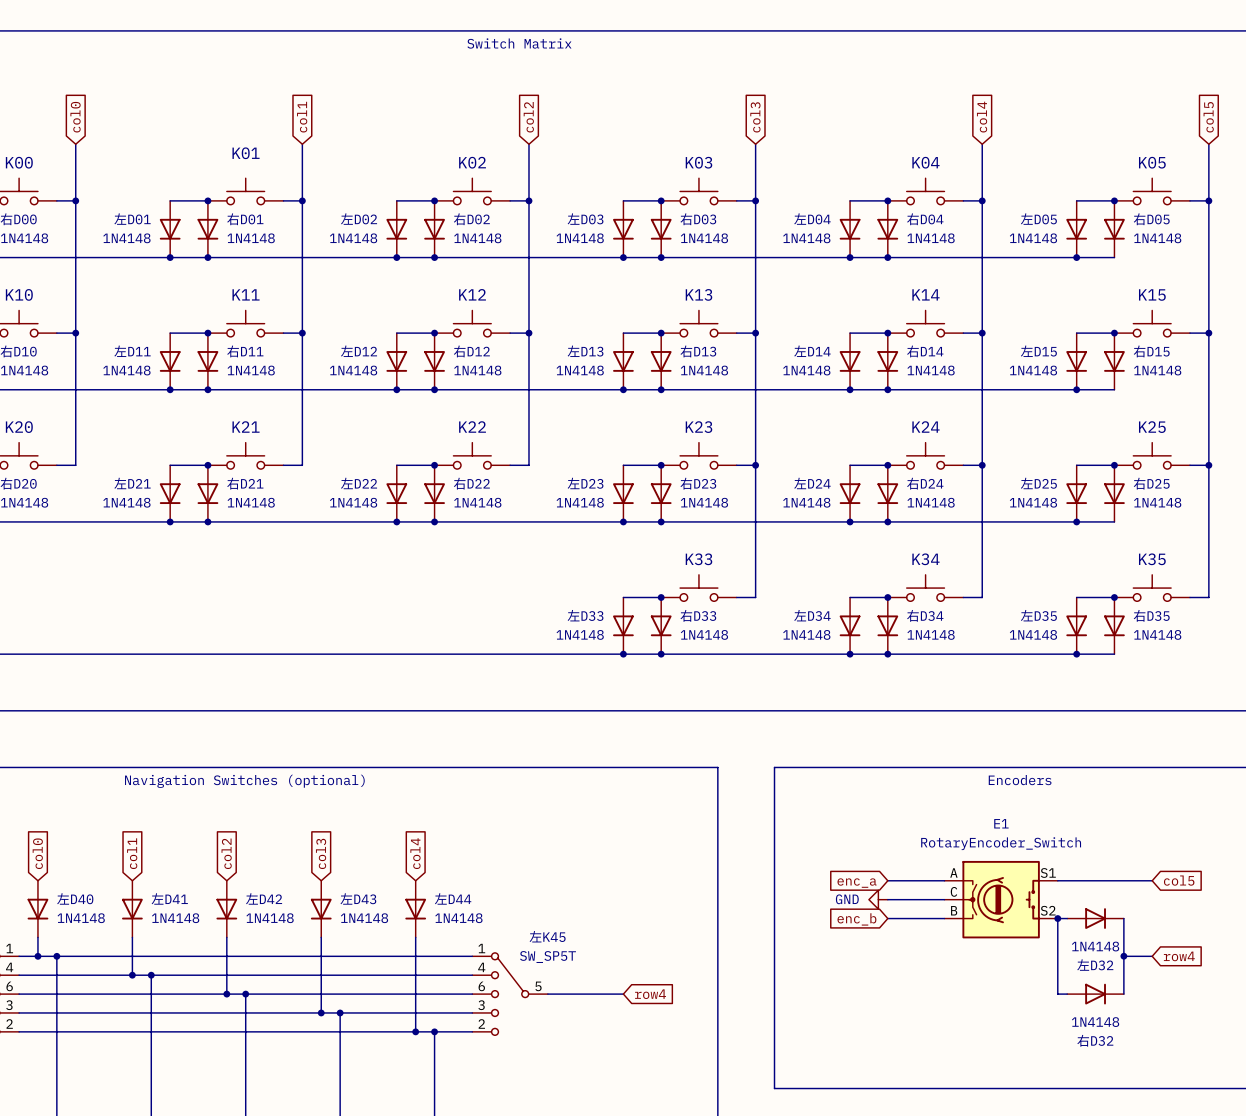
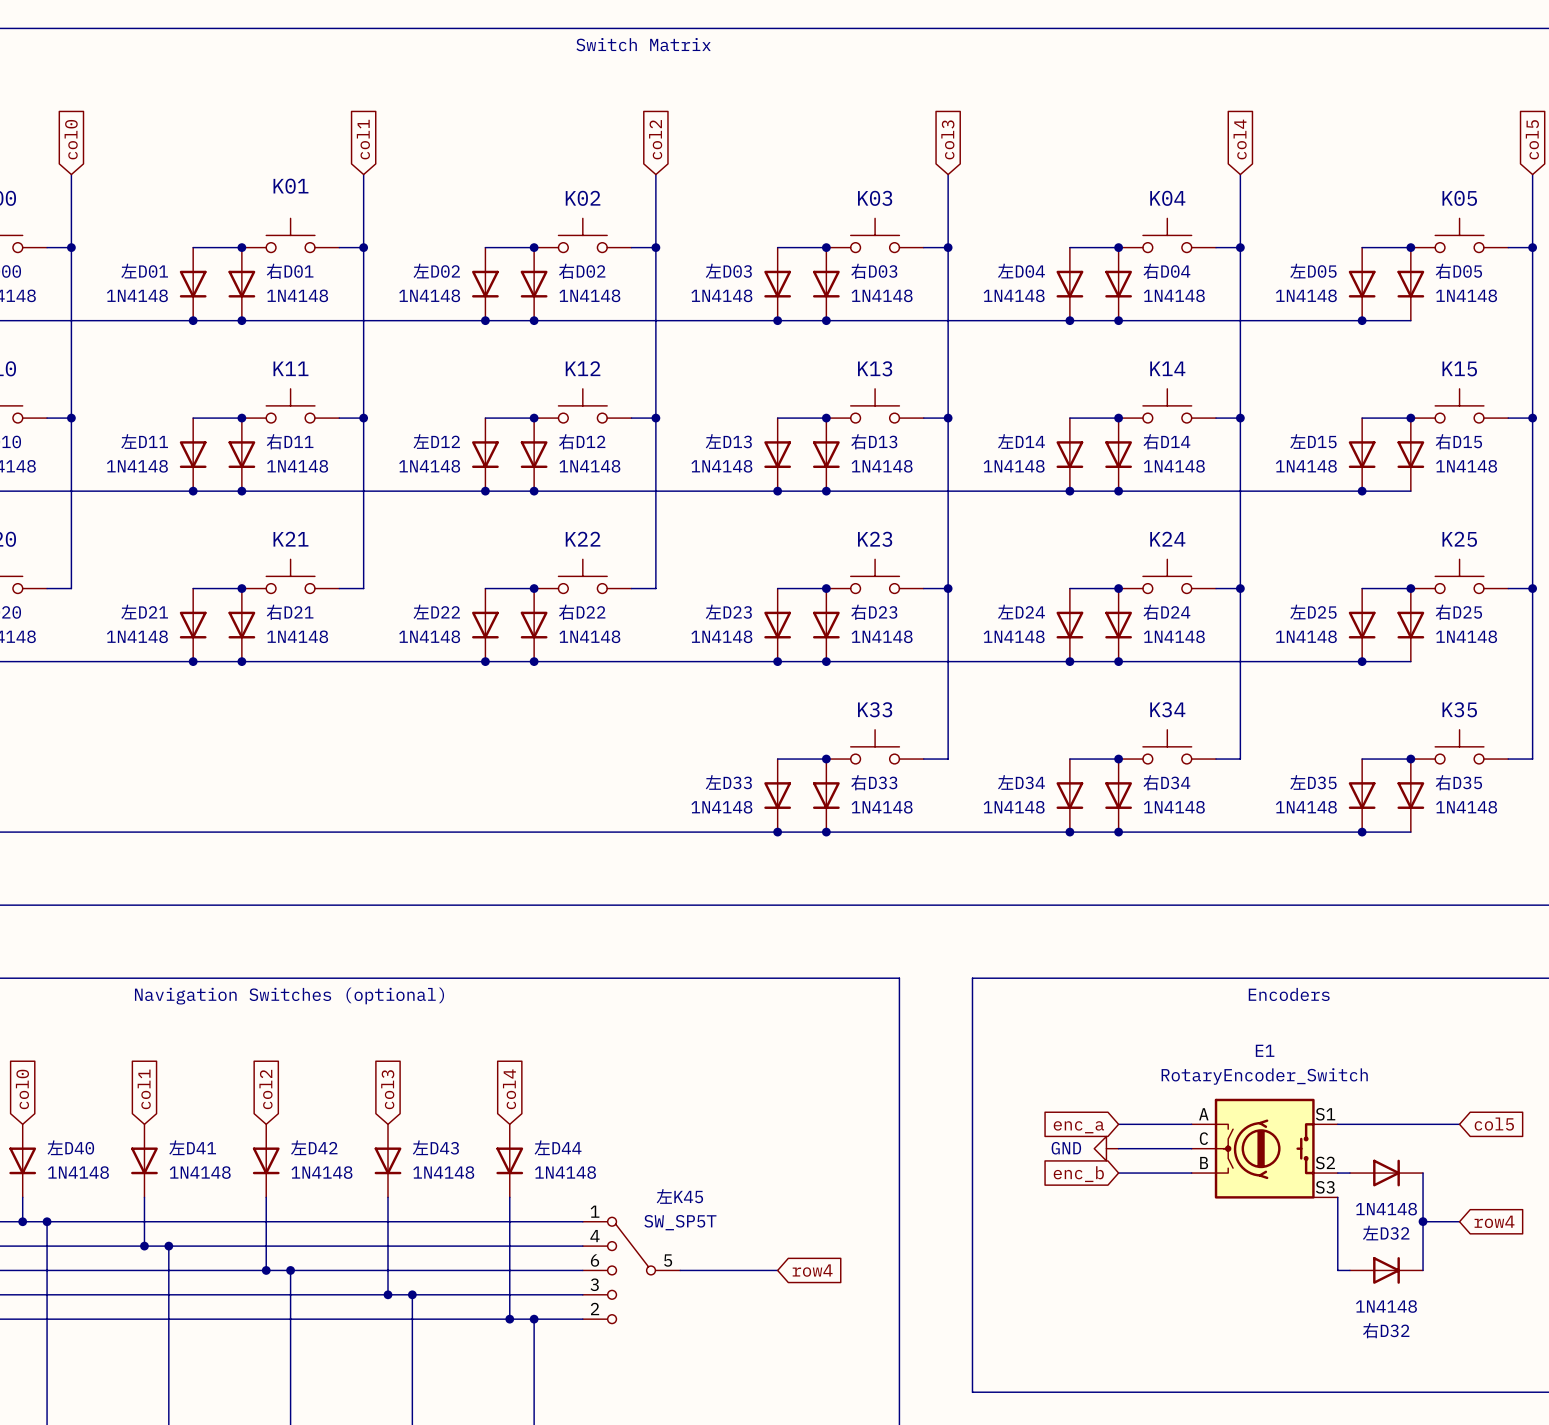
E1 symbol: [944, 860, 1058, 939] -> [1191, 1098, 1338, 1199]
wire: (1057, 918) (1057, 937) -> none
junction: (1057, 918) -> none

